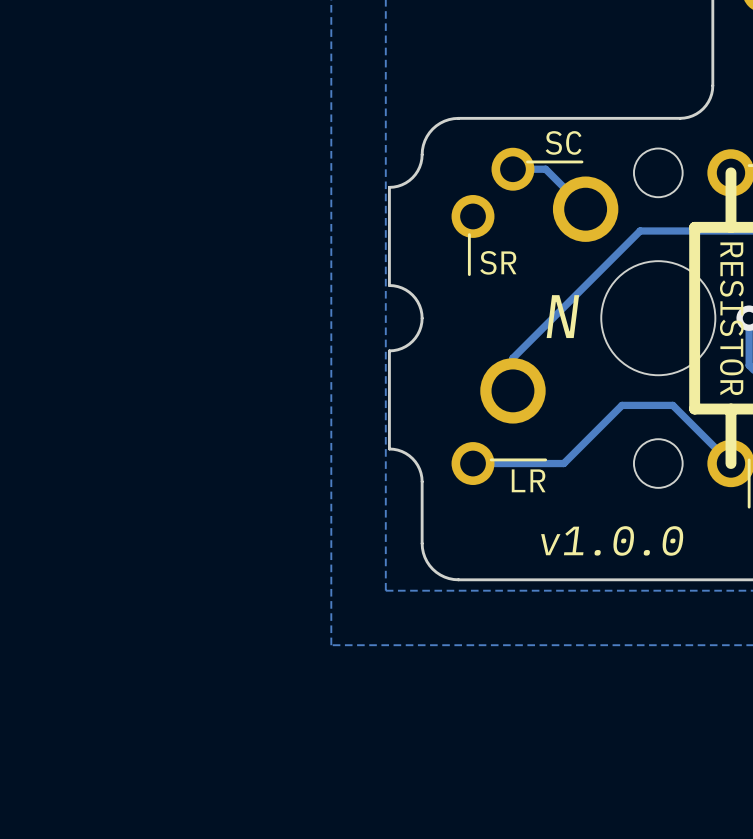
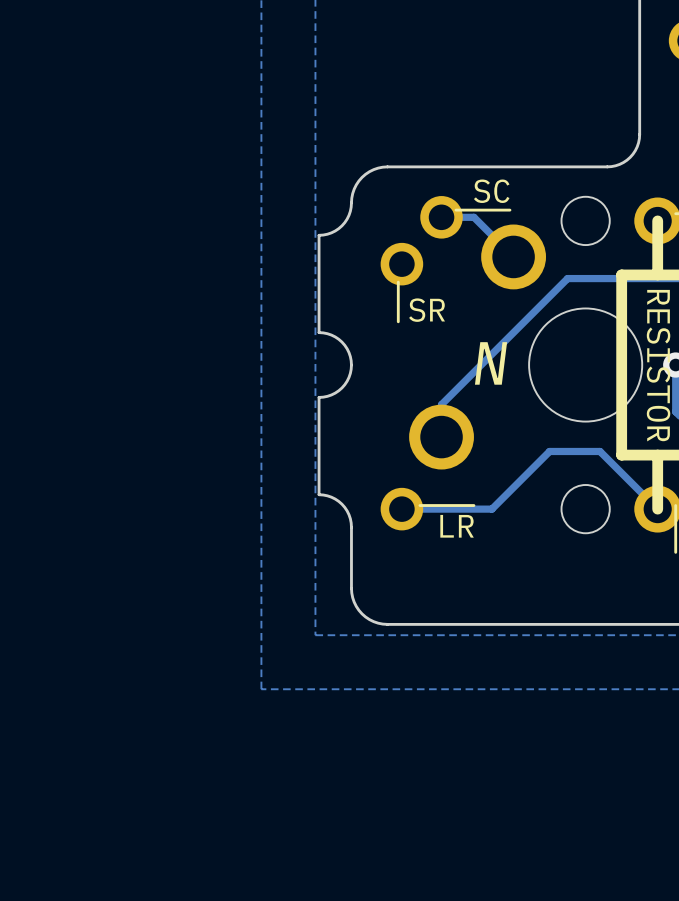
text: v1.0.0 (612, 540) -> none

